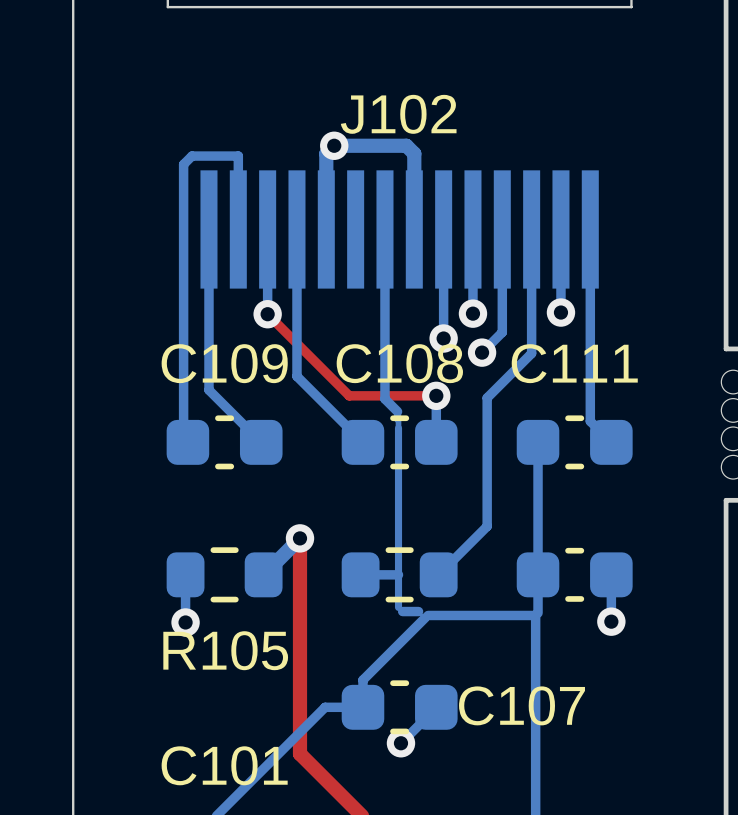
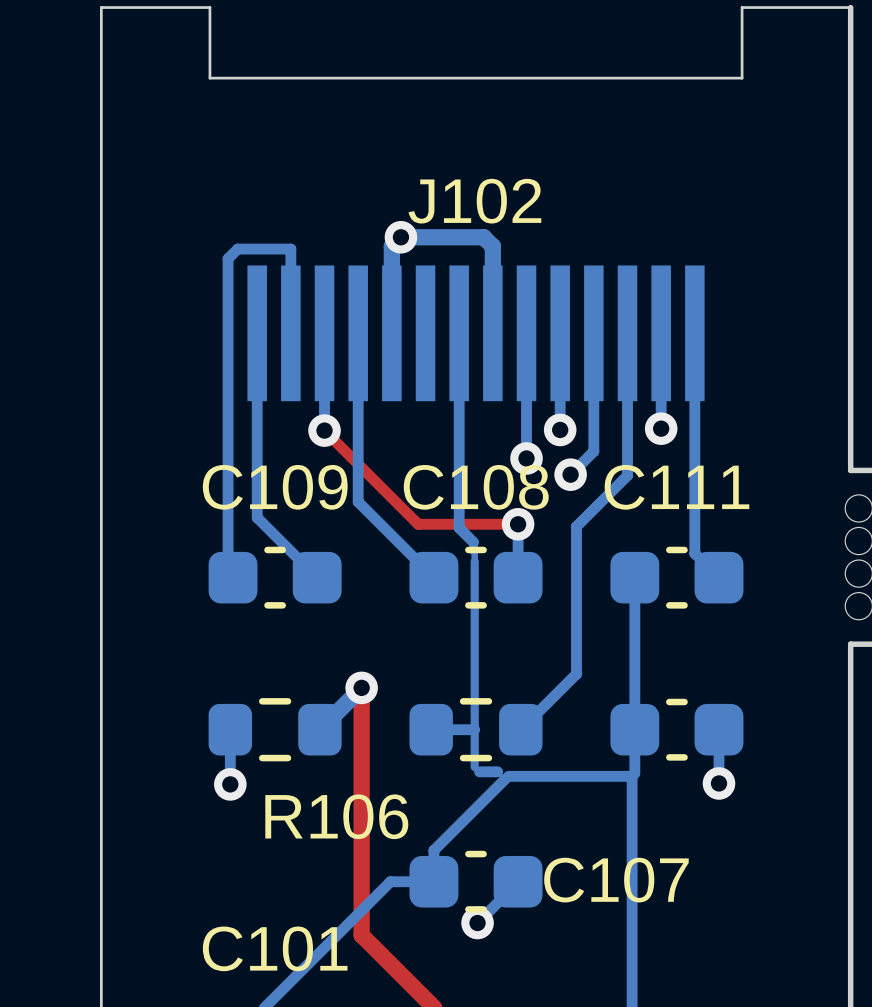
R105 name: R105 (225, 650) -> none
R106 name: none -> R106 (336, 816)

